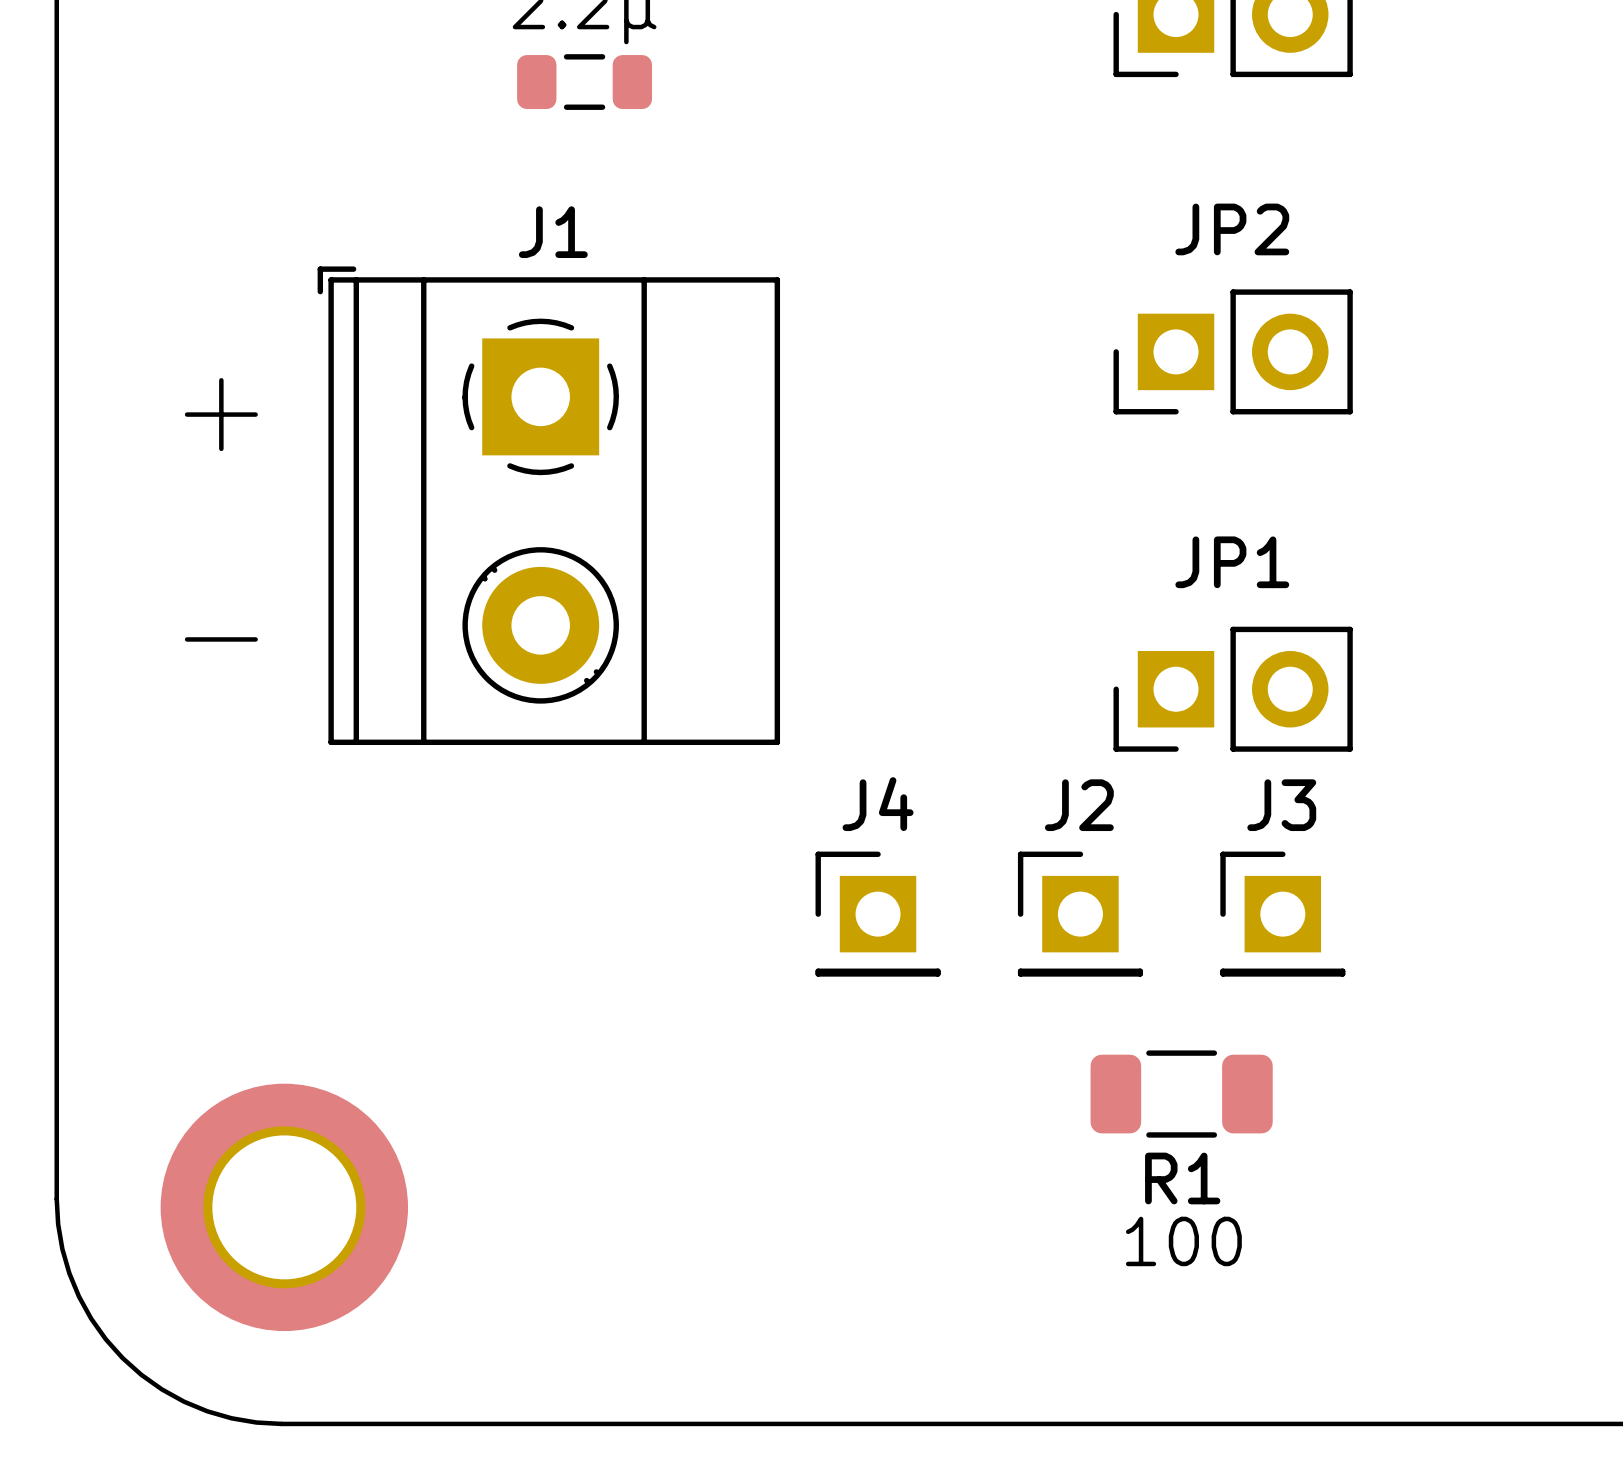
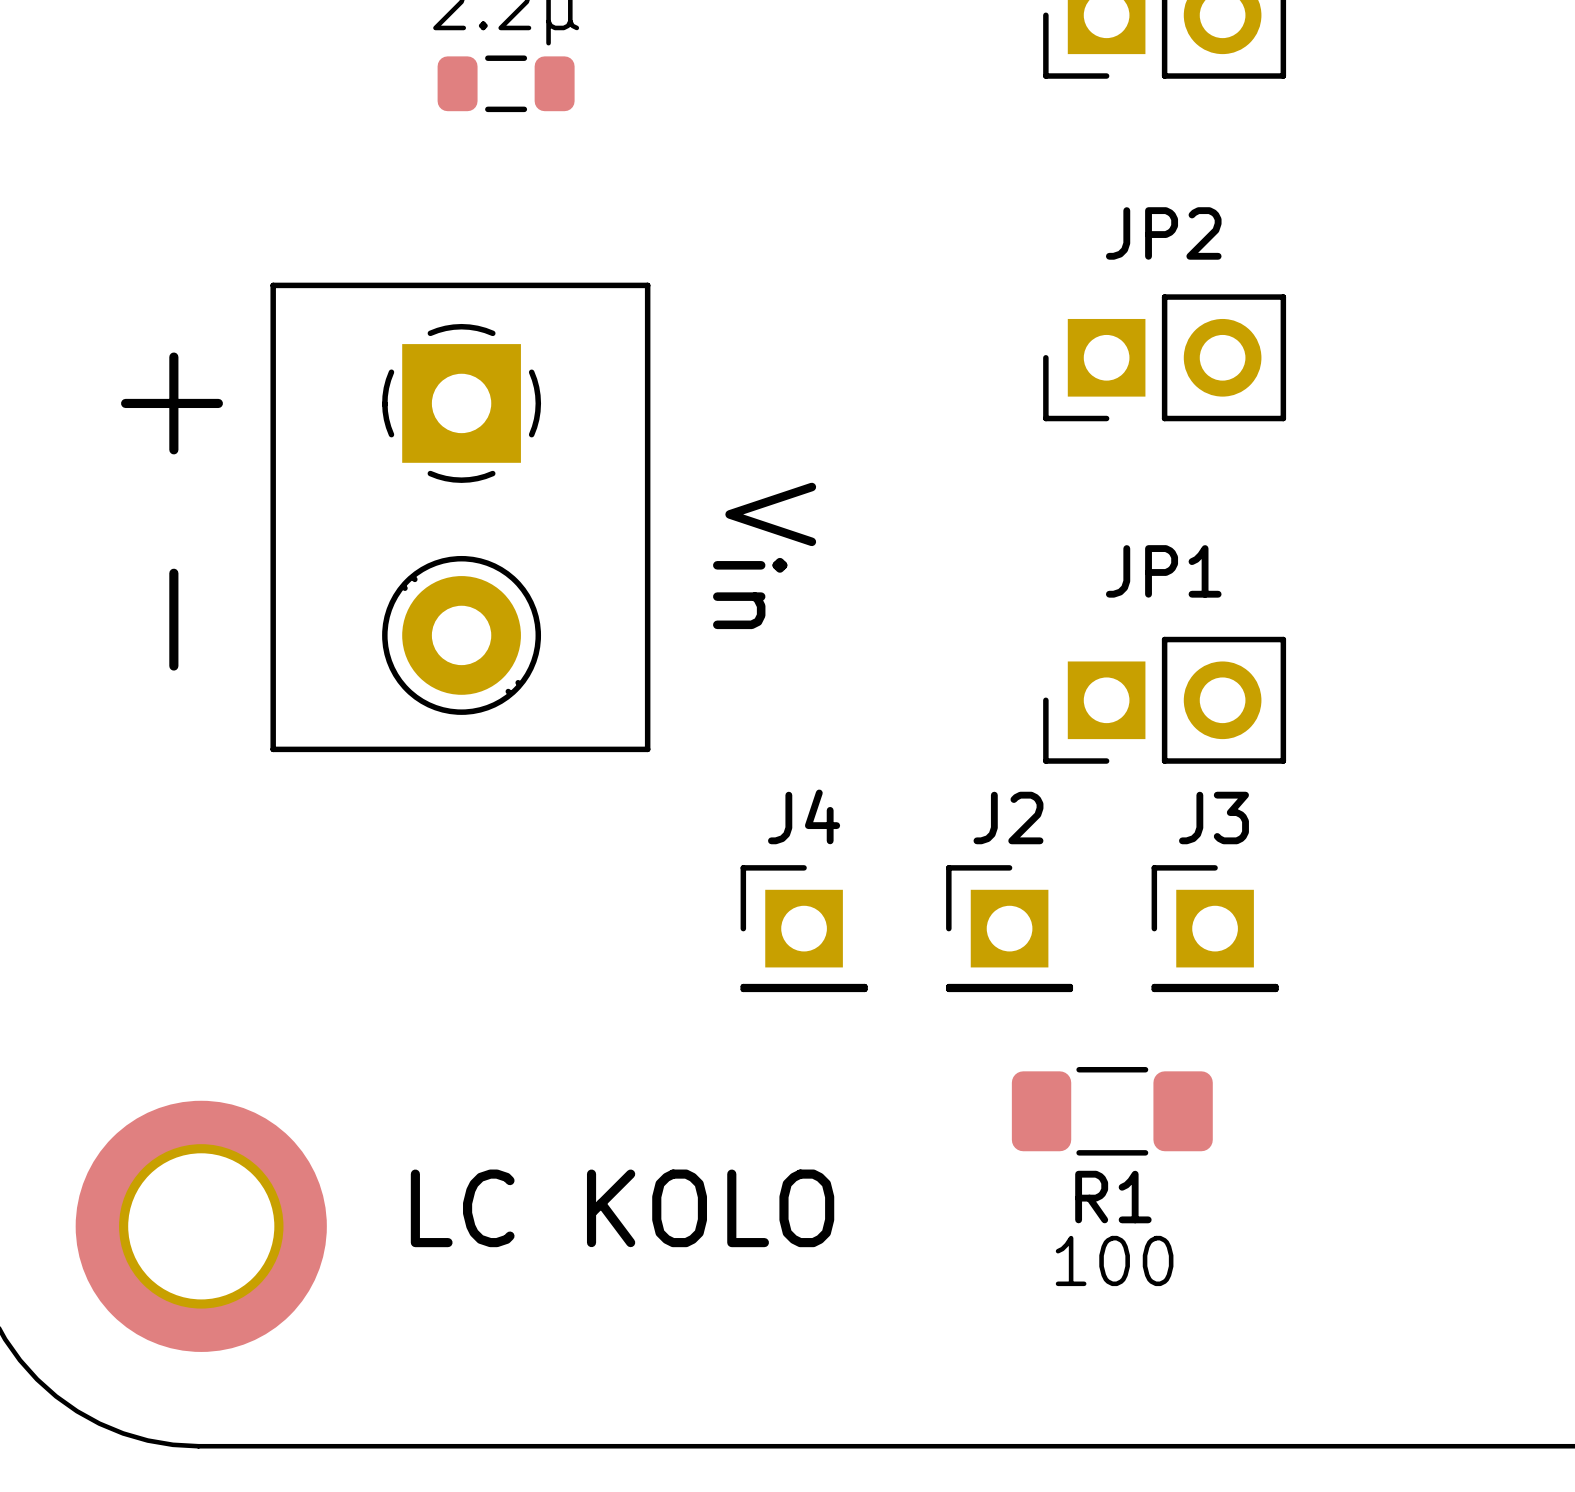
text: + (221, 414) -> none
J1: (548, 505) -> none
part: none -> (385, 517)
text: - (221, 639) -> none
R1 footprint: [1090, 1050, 1273, 1138] -> [1011, 1066, 1213, 1156]
text: none -> LC KOLO (622, 1208)

